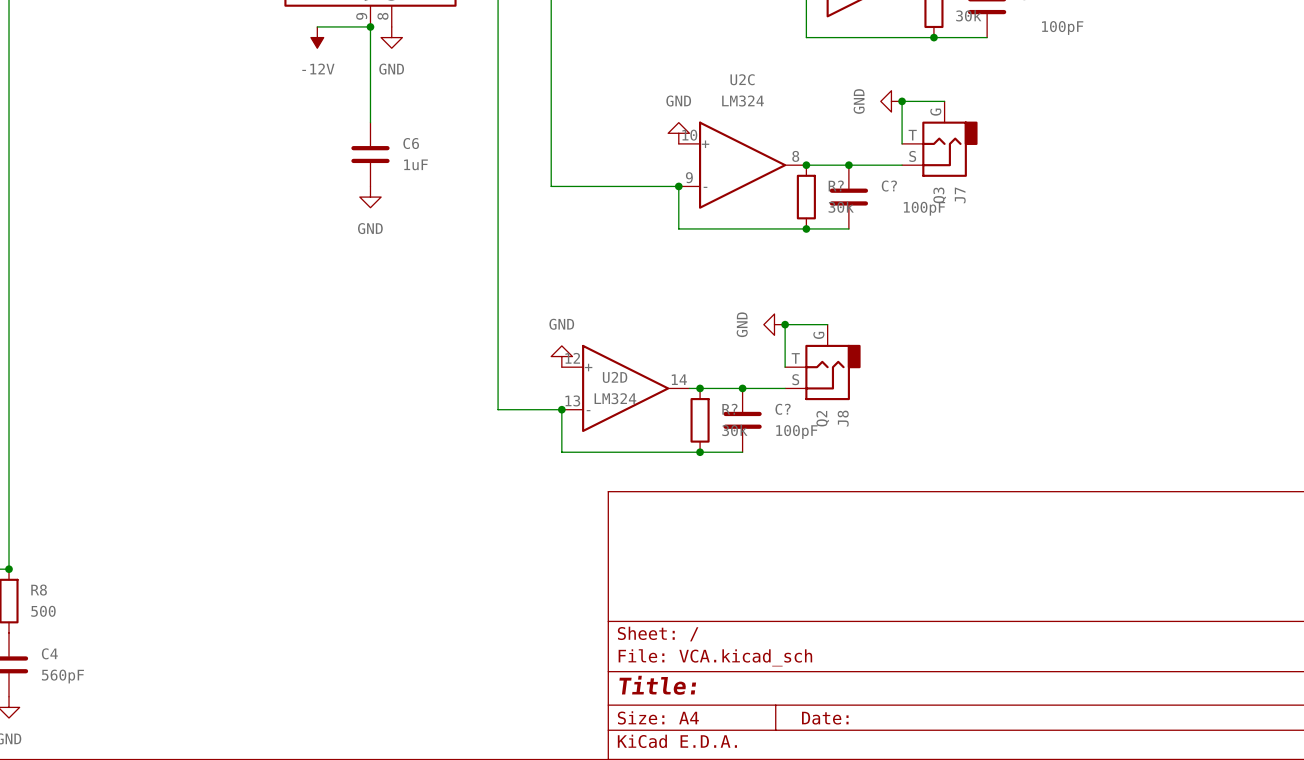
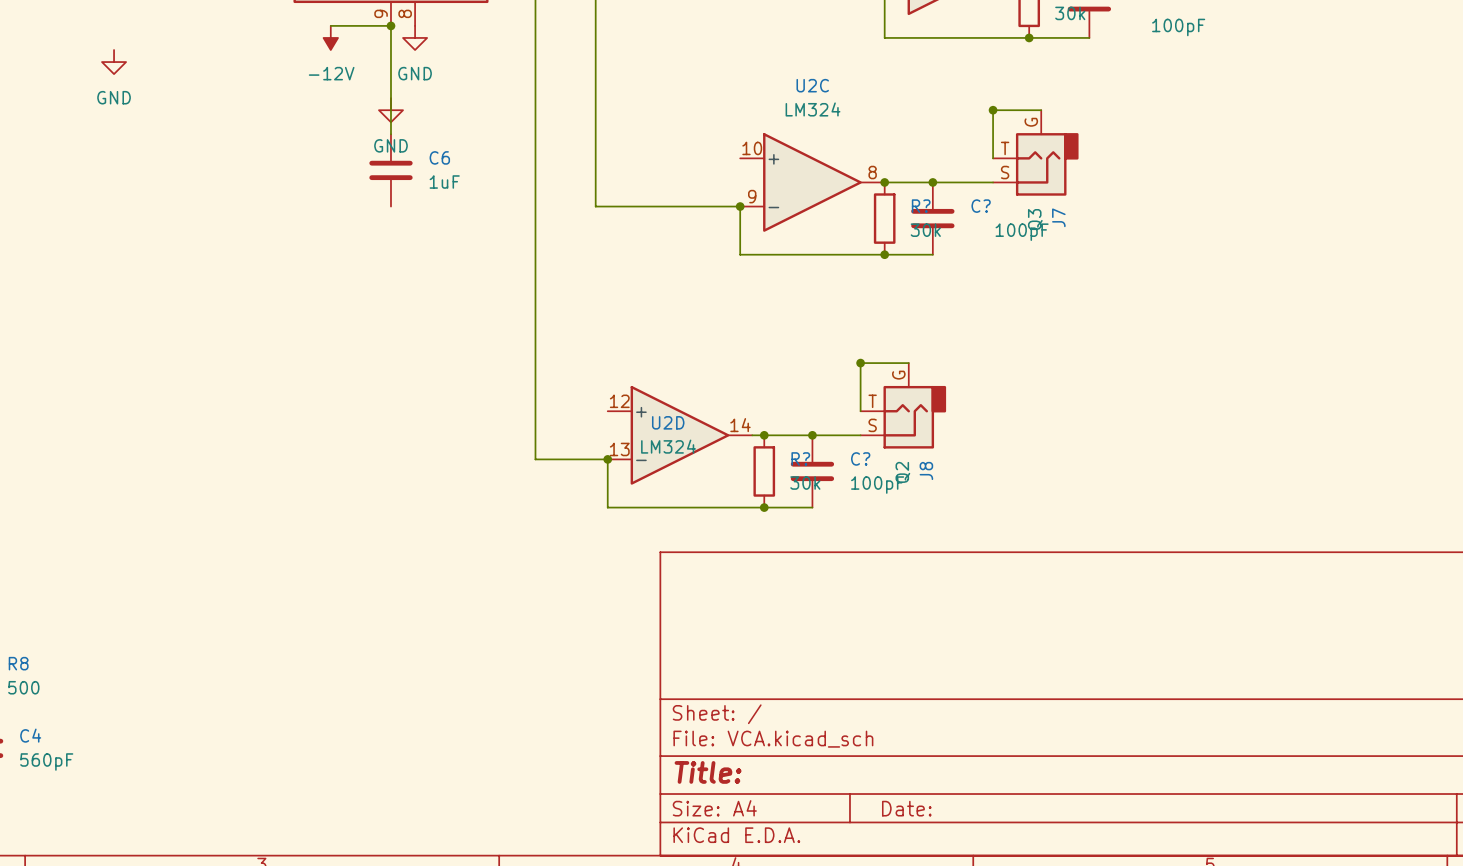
power symbol: none -> GND (114, 62)
power symbol: GND (891, 101) -> none
power symbol: GND (678, 133) -> none
power symbol position: GND (370, 197) -> GND (390, 110)
power symbol: GND (774, 324) -> none
power symbol: GND (561, 356) -> none

